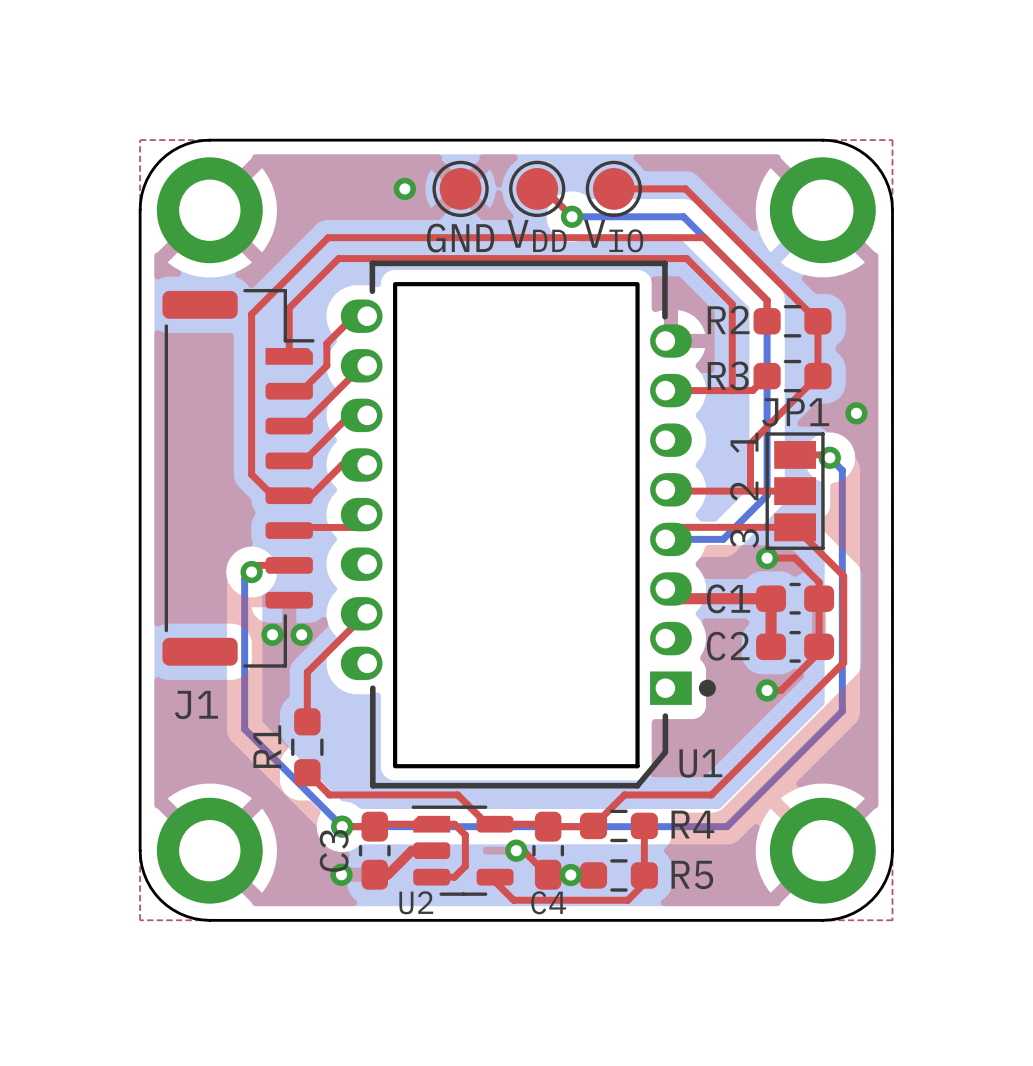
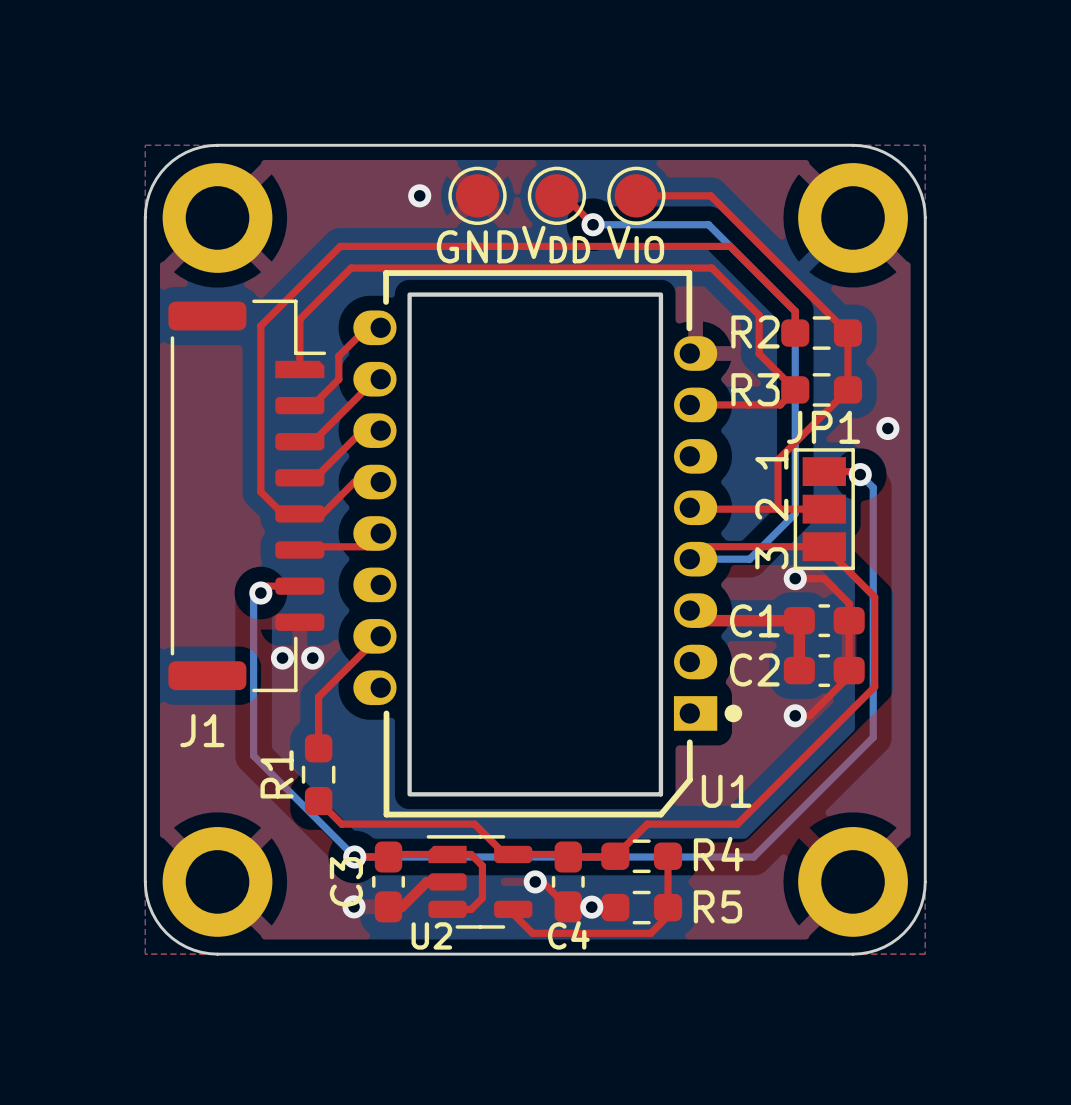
top track: (732, 341) (732, 390) -> (759, 353) (795, 389)

